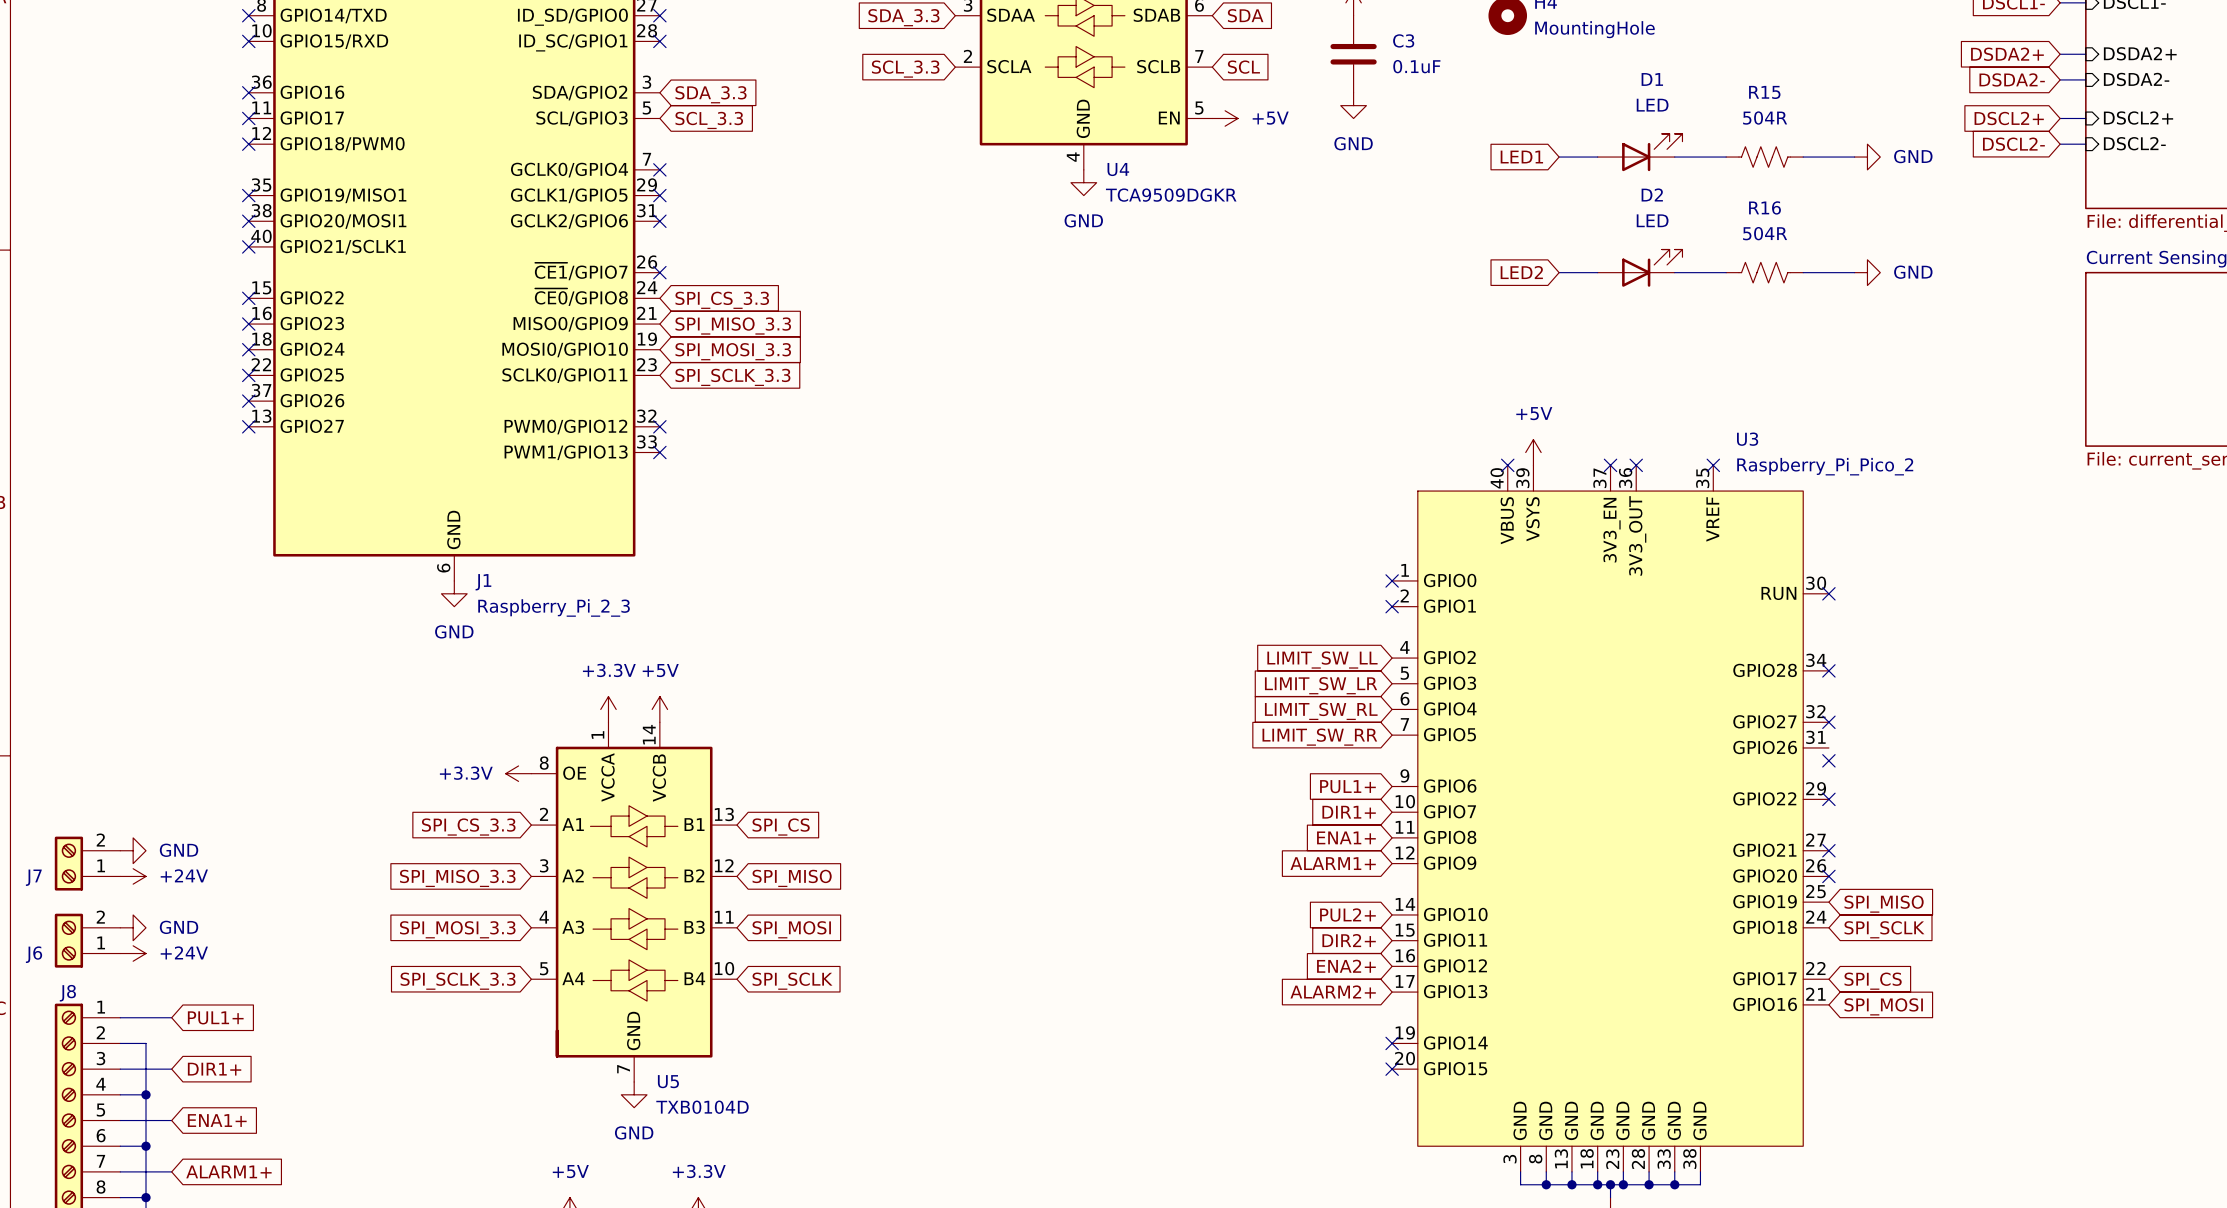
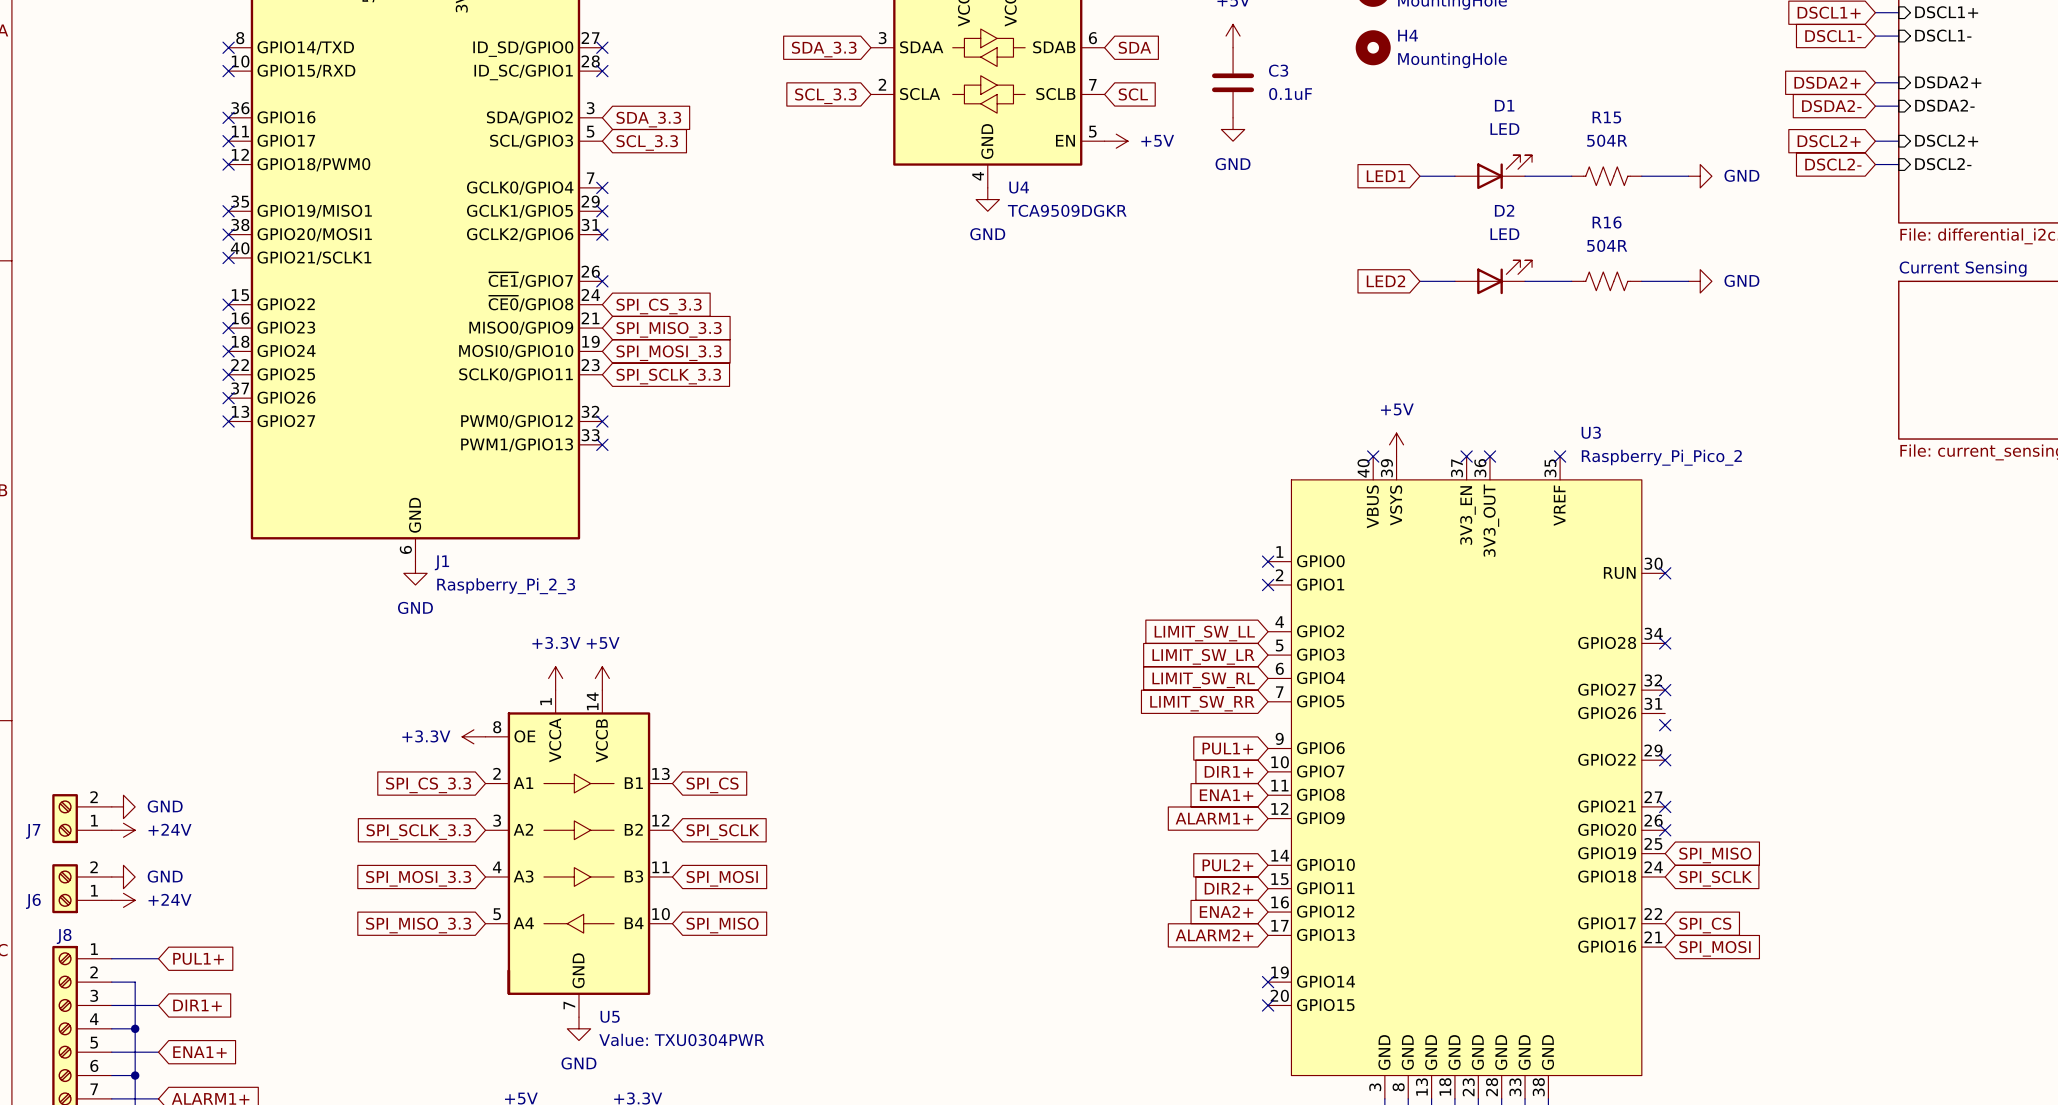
U5 symbol: [531, 722, 737, 1082] -> [485, 690, 673, 1018]
global label: SPI_MISO_3.3 (457, 878) -> SPI_SCLK_3.3 (418, 832)
global label: SPI_MISO (792, 878) -> SPI_SCLK (722, 832)
global label: SPI_SCLK_3.3 (458, 981) -> SPI_MISO_3.3 (418, 925)
global label: SPI_SCLK (792, 981) -> SPI_MISO (722, 925)
U5 value: TXB0104D (702, 1107) -> Value: TXU0304PWR (681, 1039)

